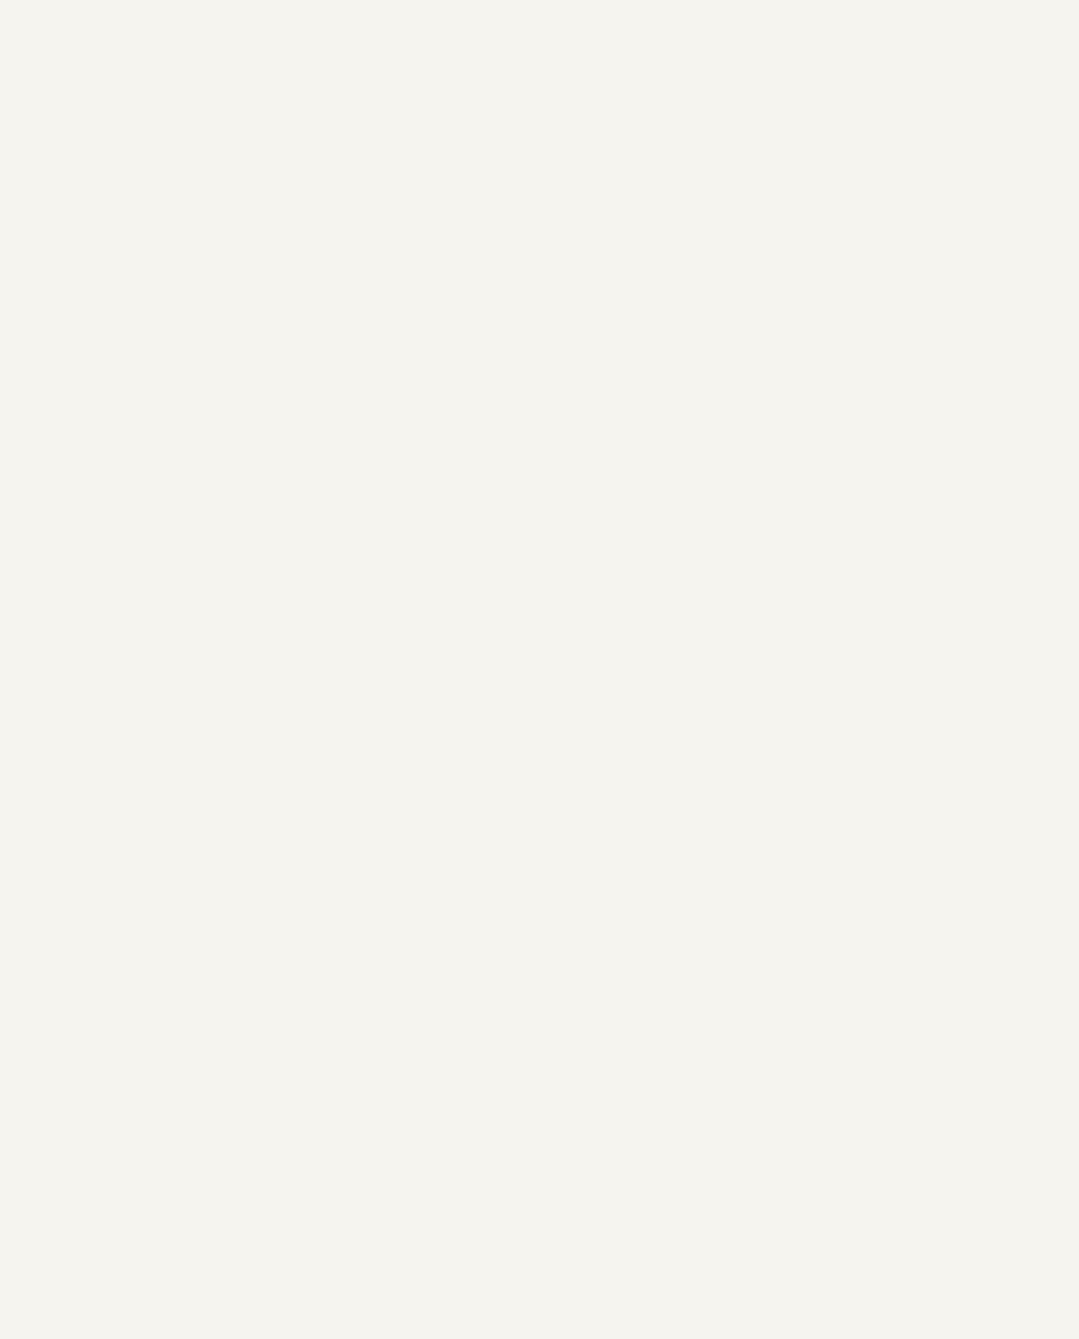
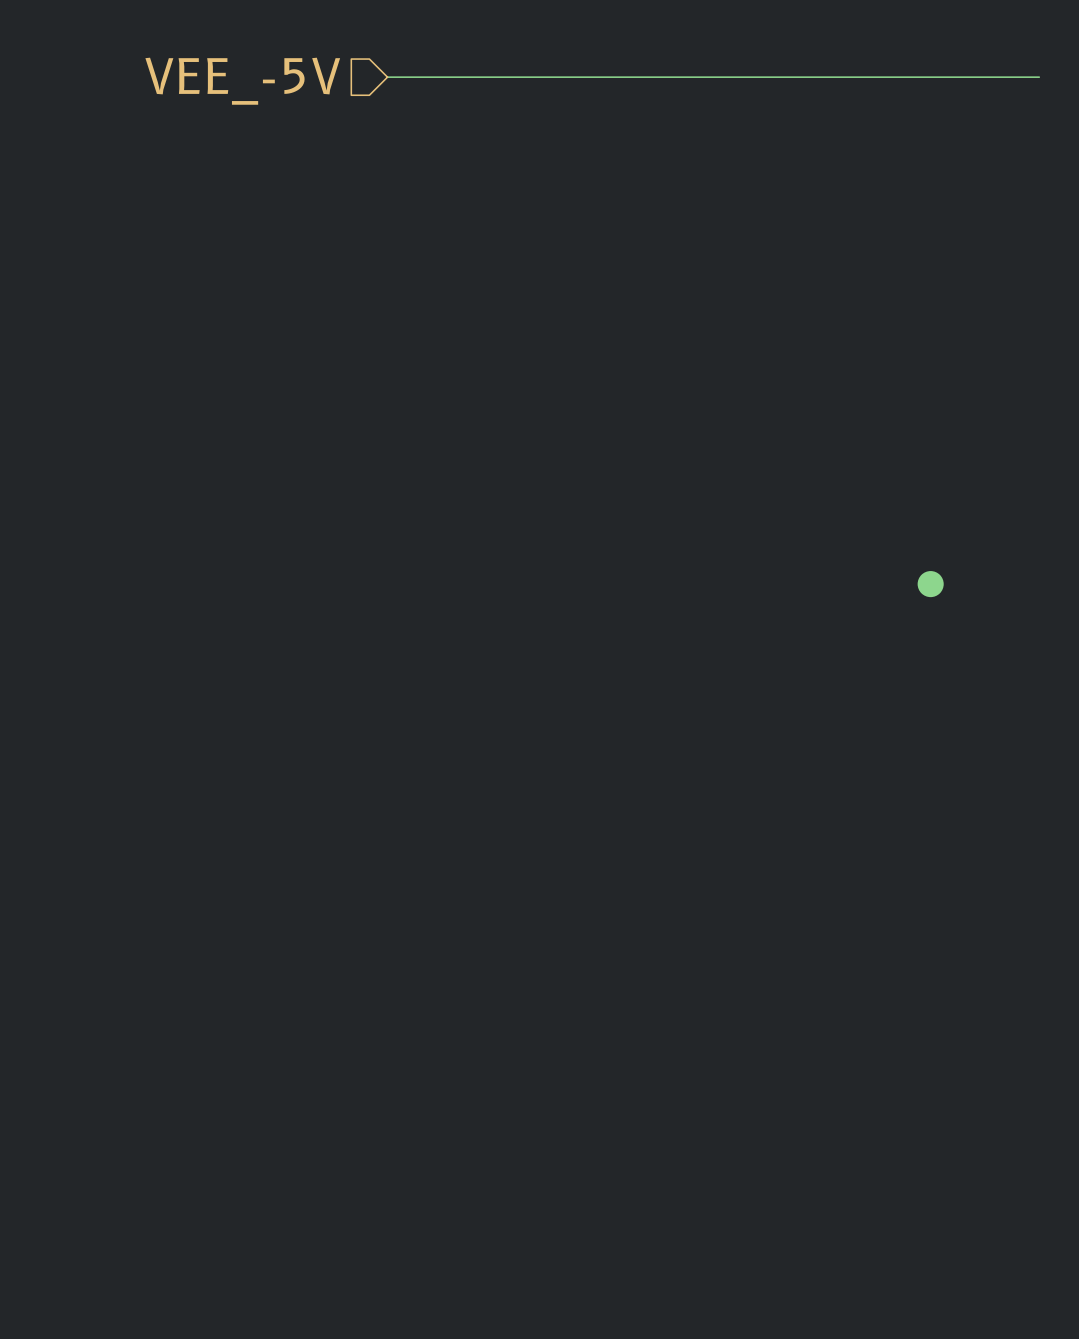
hierarchical label: none -> VEE_-5V (242, 81)
wire: none -> (387, 77) (1039, 77)
junction: none -> (930, 584)

